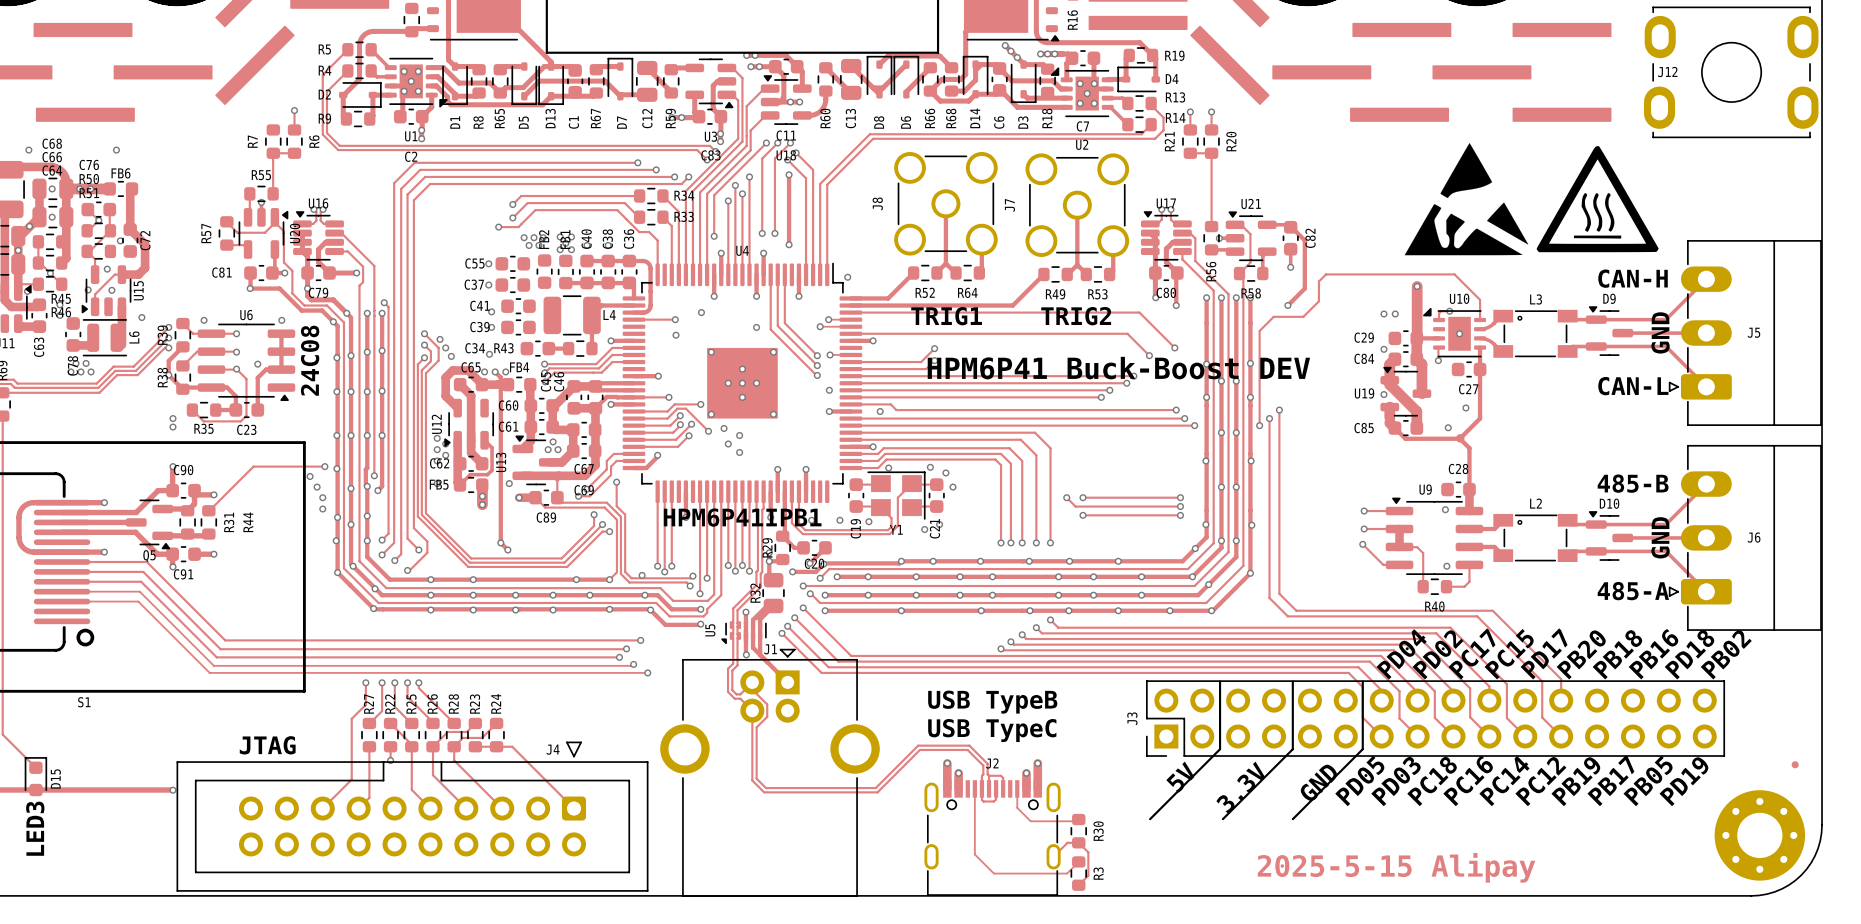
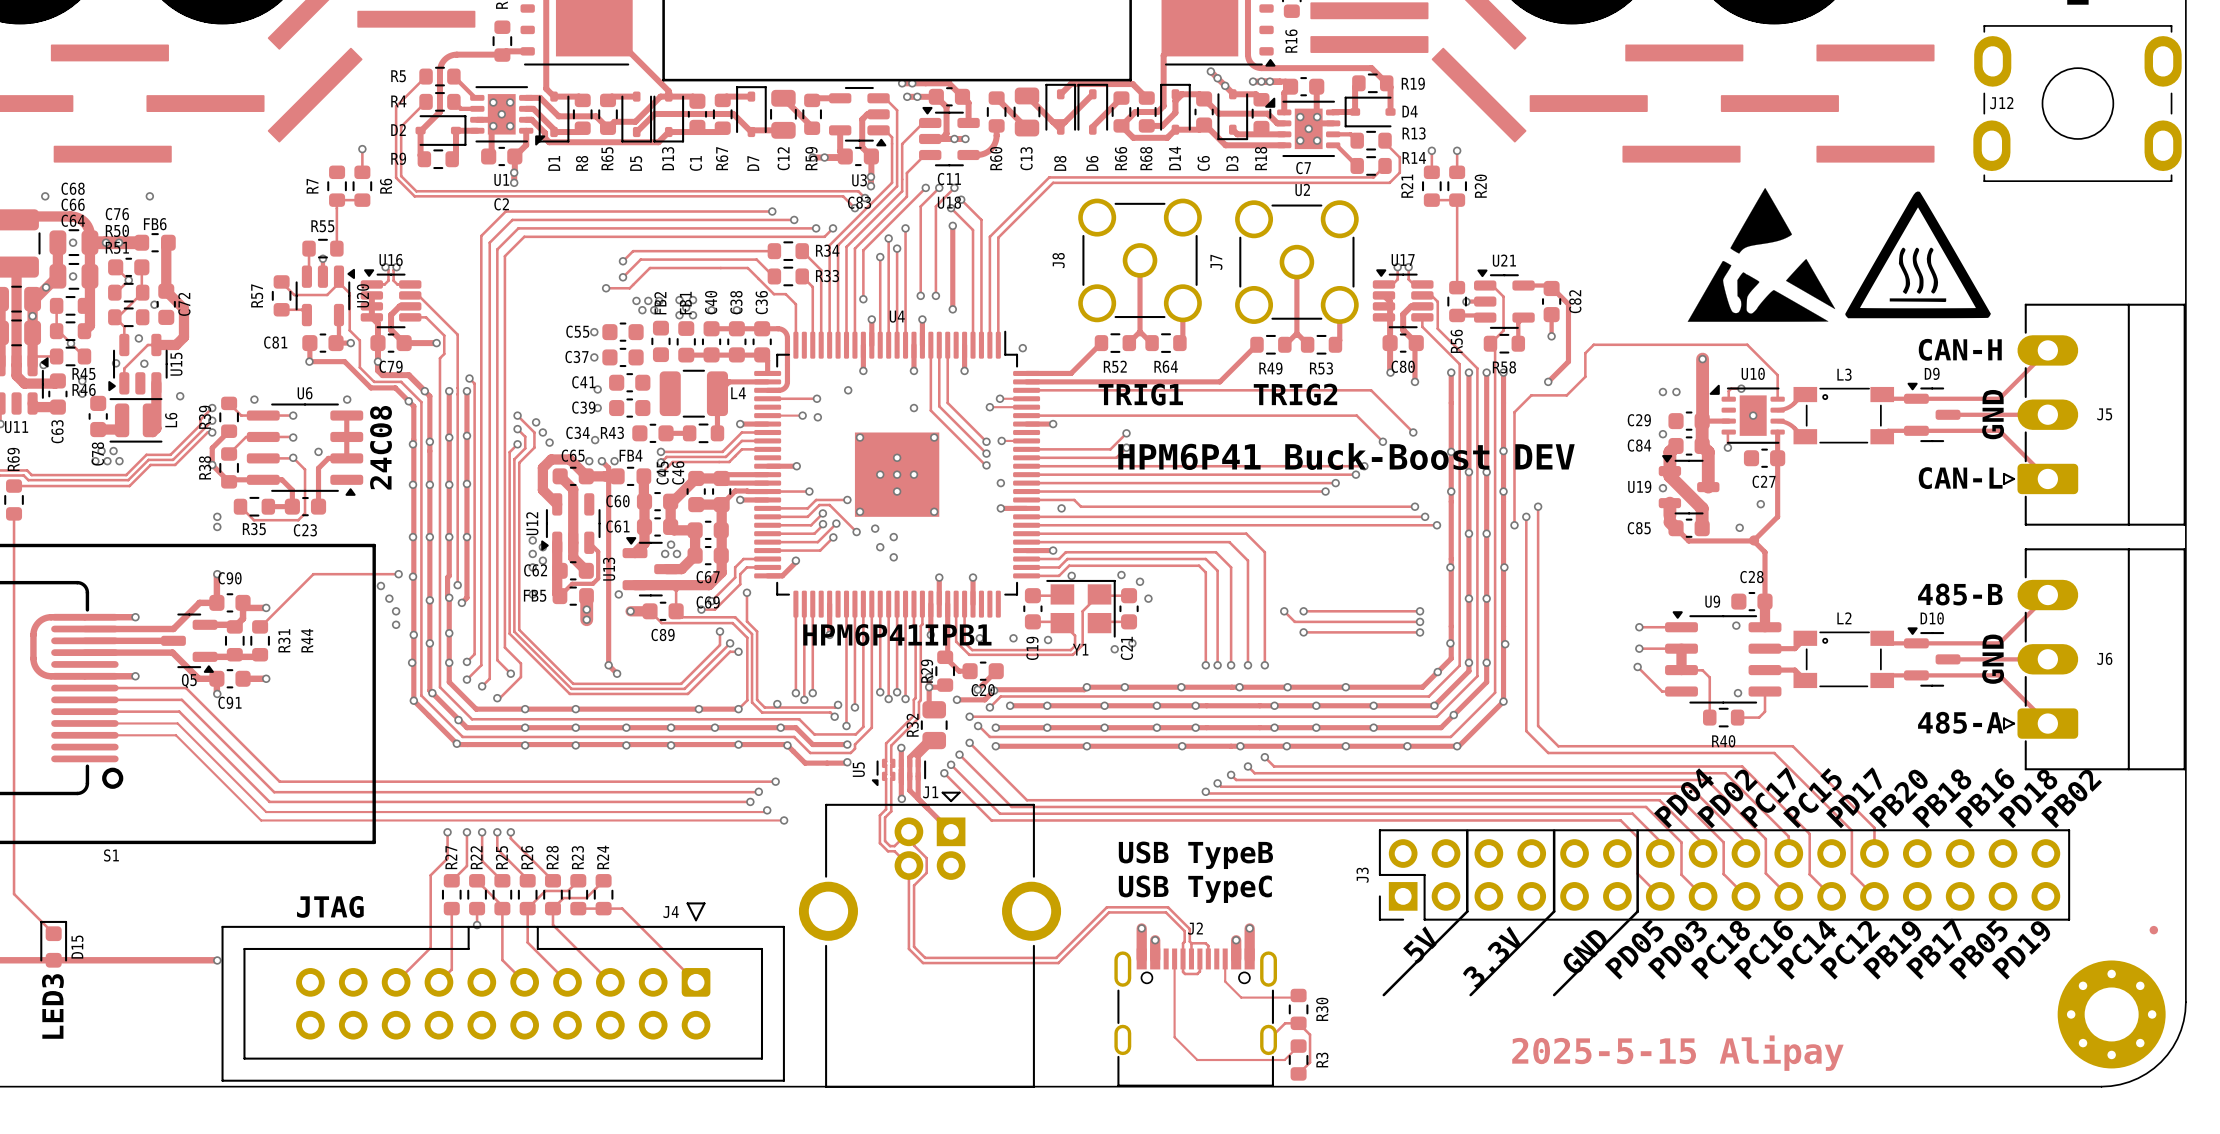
track: none -> (767, 415) (802, 415)
via: none -> (802, 415)

